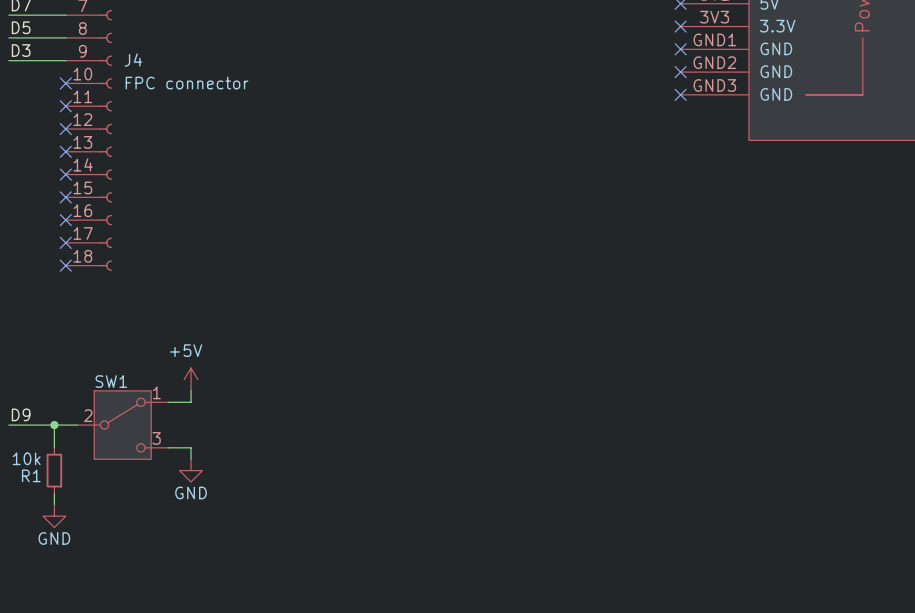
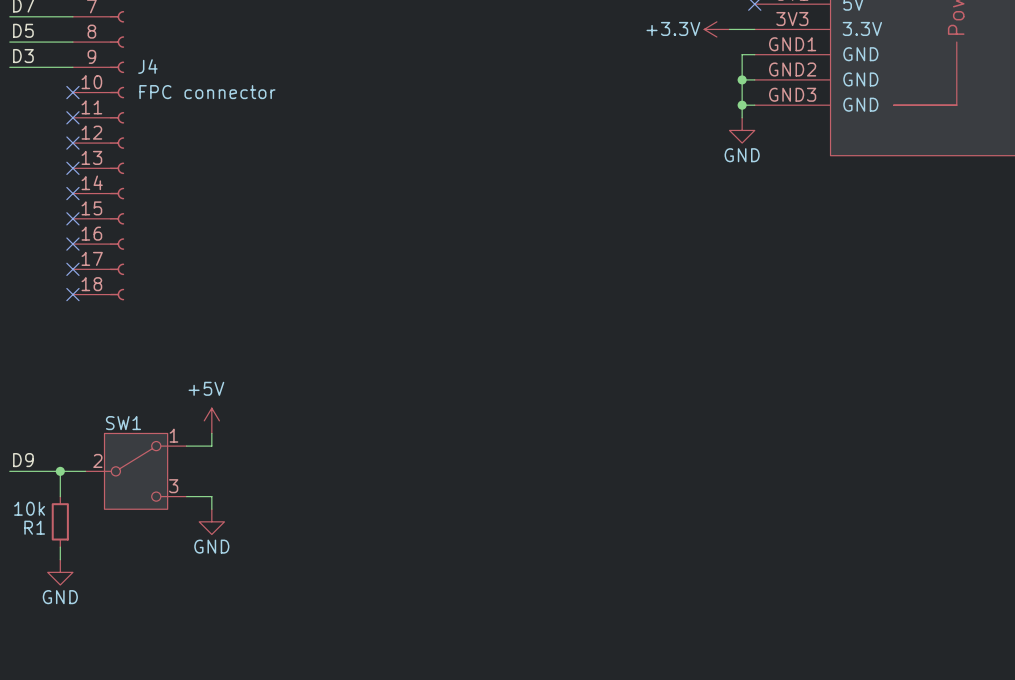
power symbol: none -> +3.3V (716, 29)
wire: none -> (729, 29) (754, 29)
no-connect mark: (680, 26) -> none
wire: none -> (754, 54) (742, 54) (742, 117)
no-connect mark: (680, 49) -> none
wire: none -> (742, 79) (754, 79)
junction: none -> (742, 79)
no-connect mark: (680, 72) -> none
wire: none -> (742, 105) (754, 105)
junction: none -> (742, 105)
no-connect mark: (680, 94) -> none
power symbol: none -> GND (742, 130)

